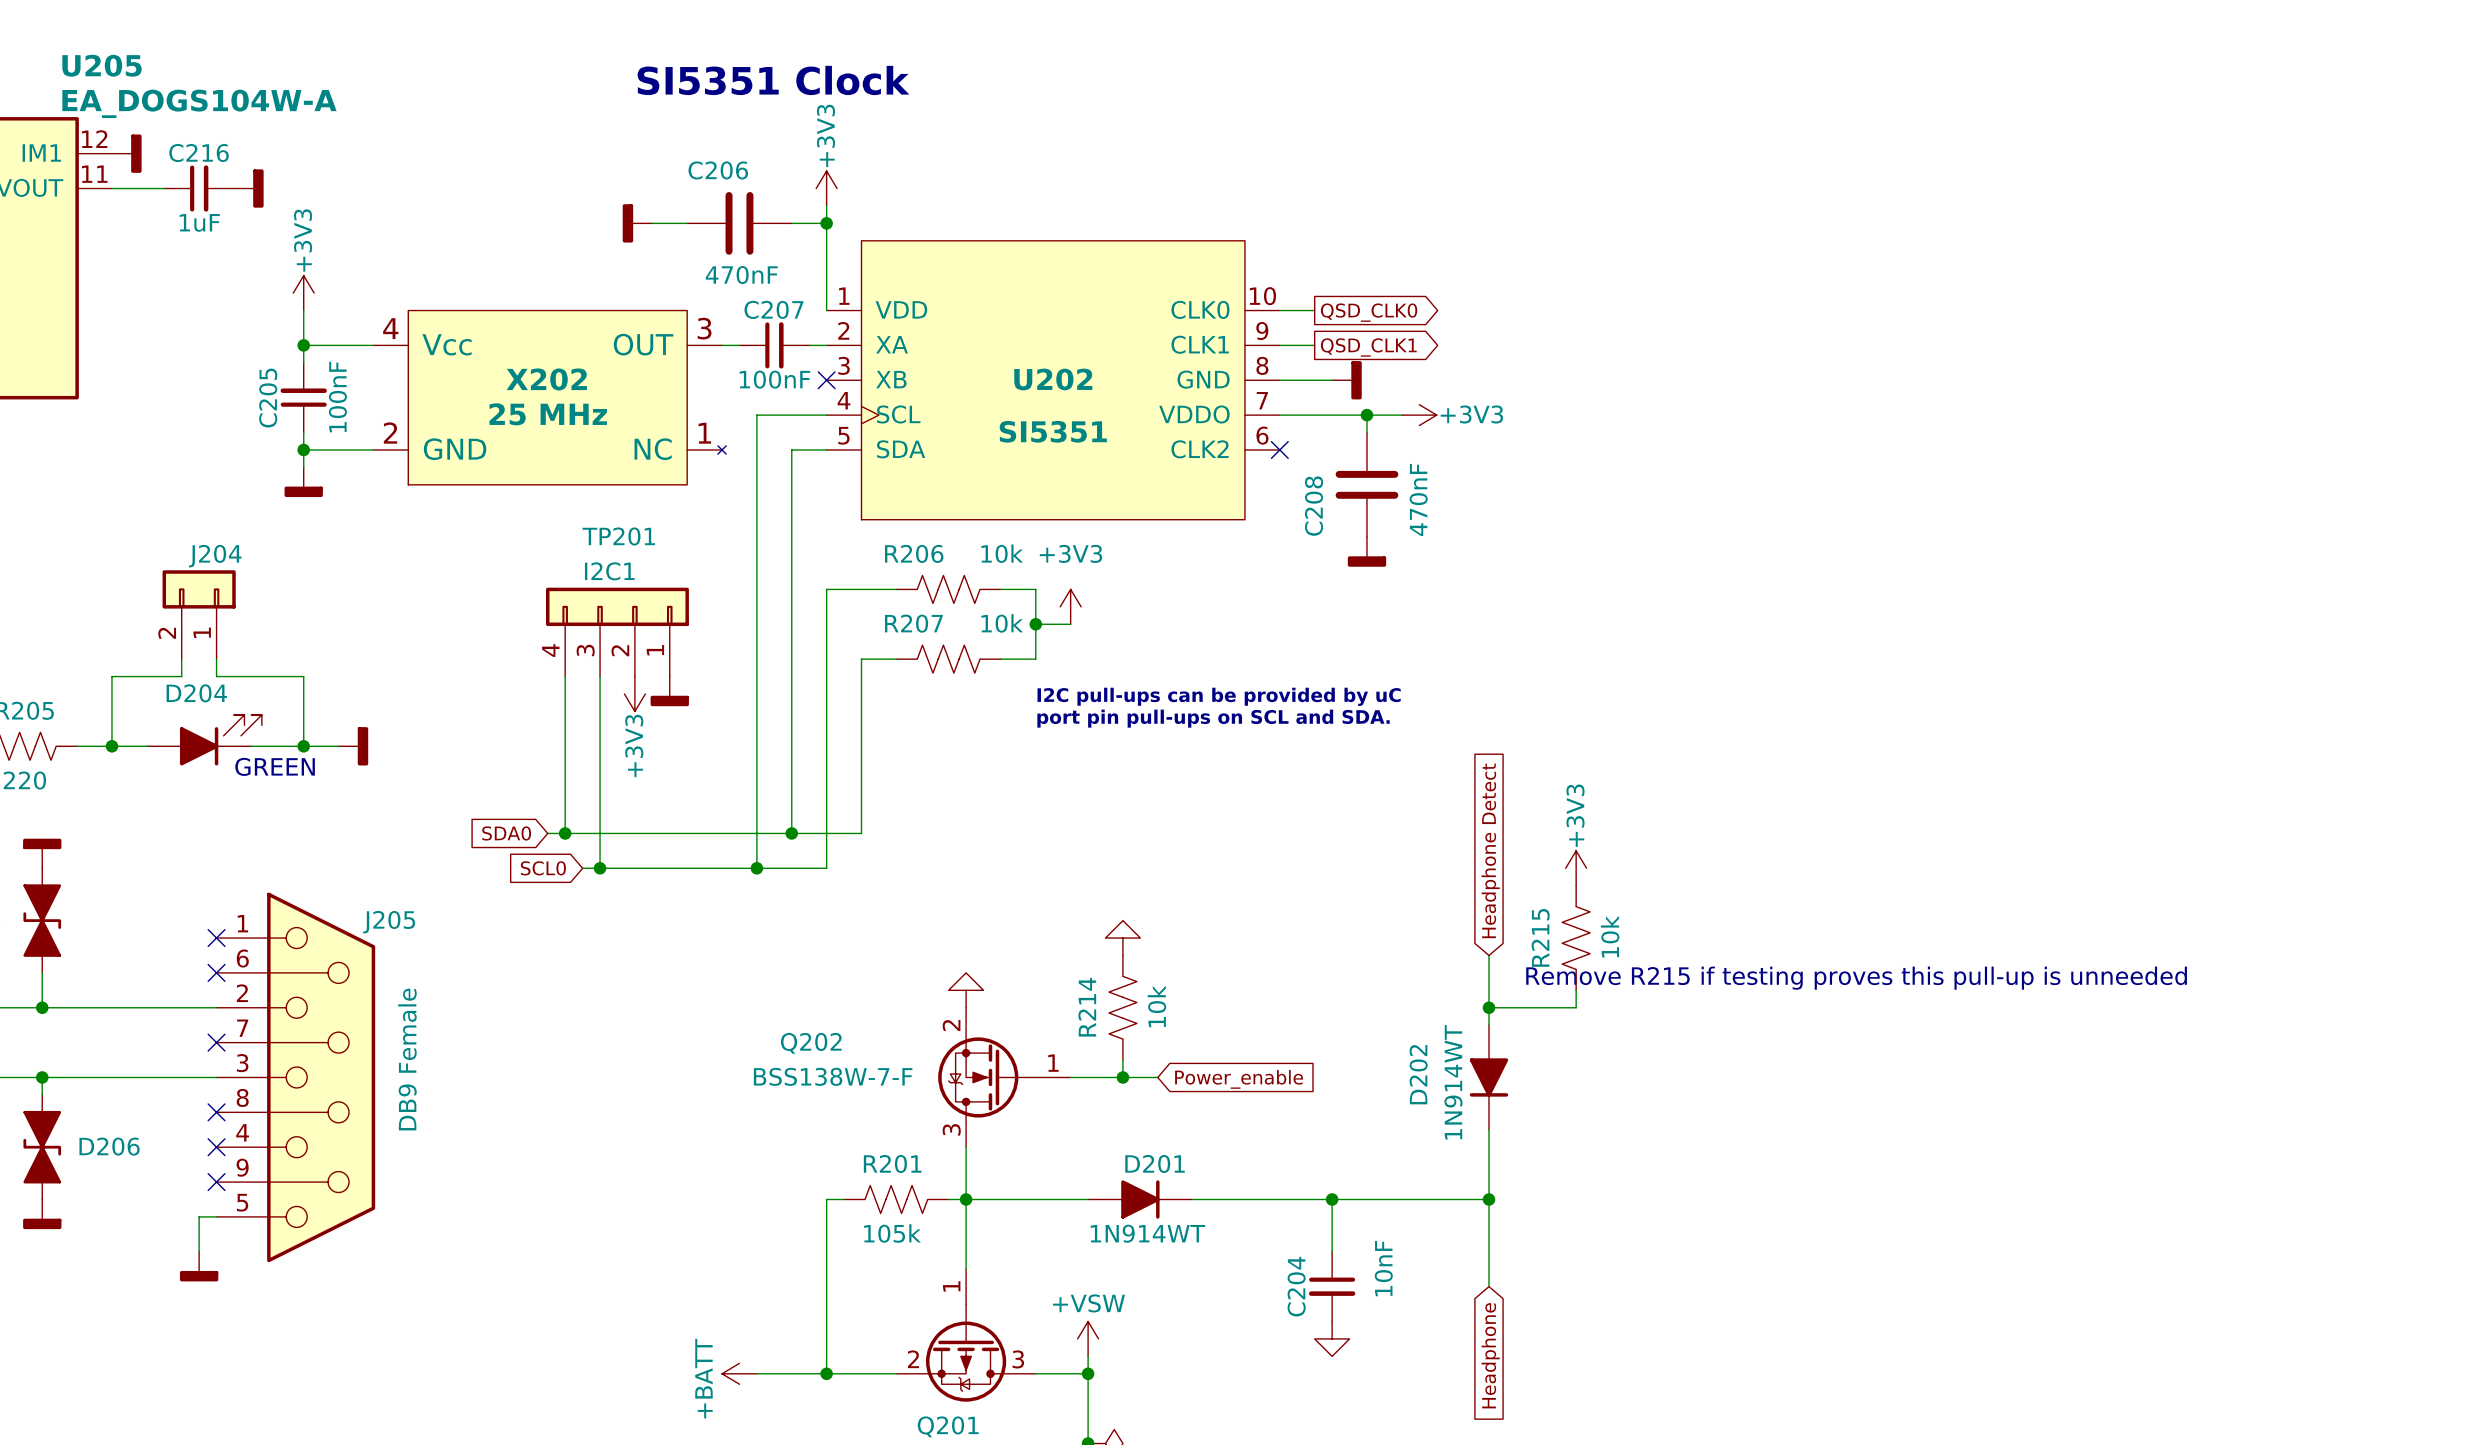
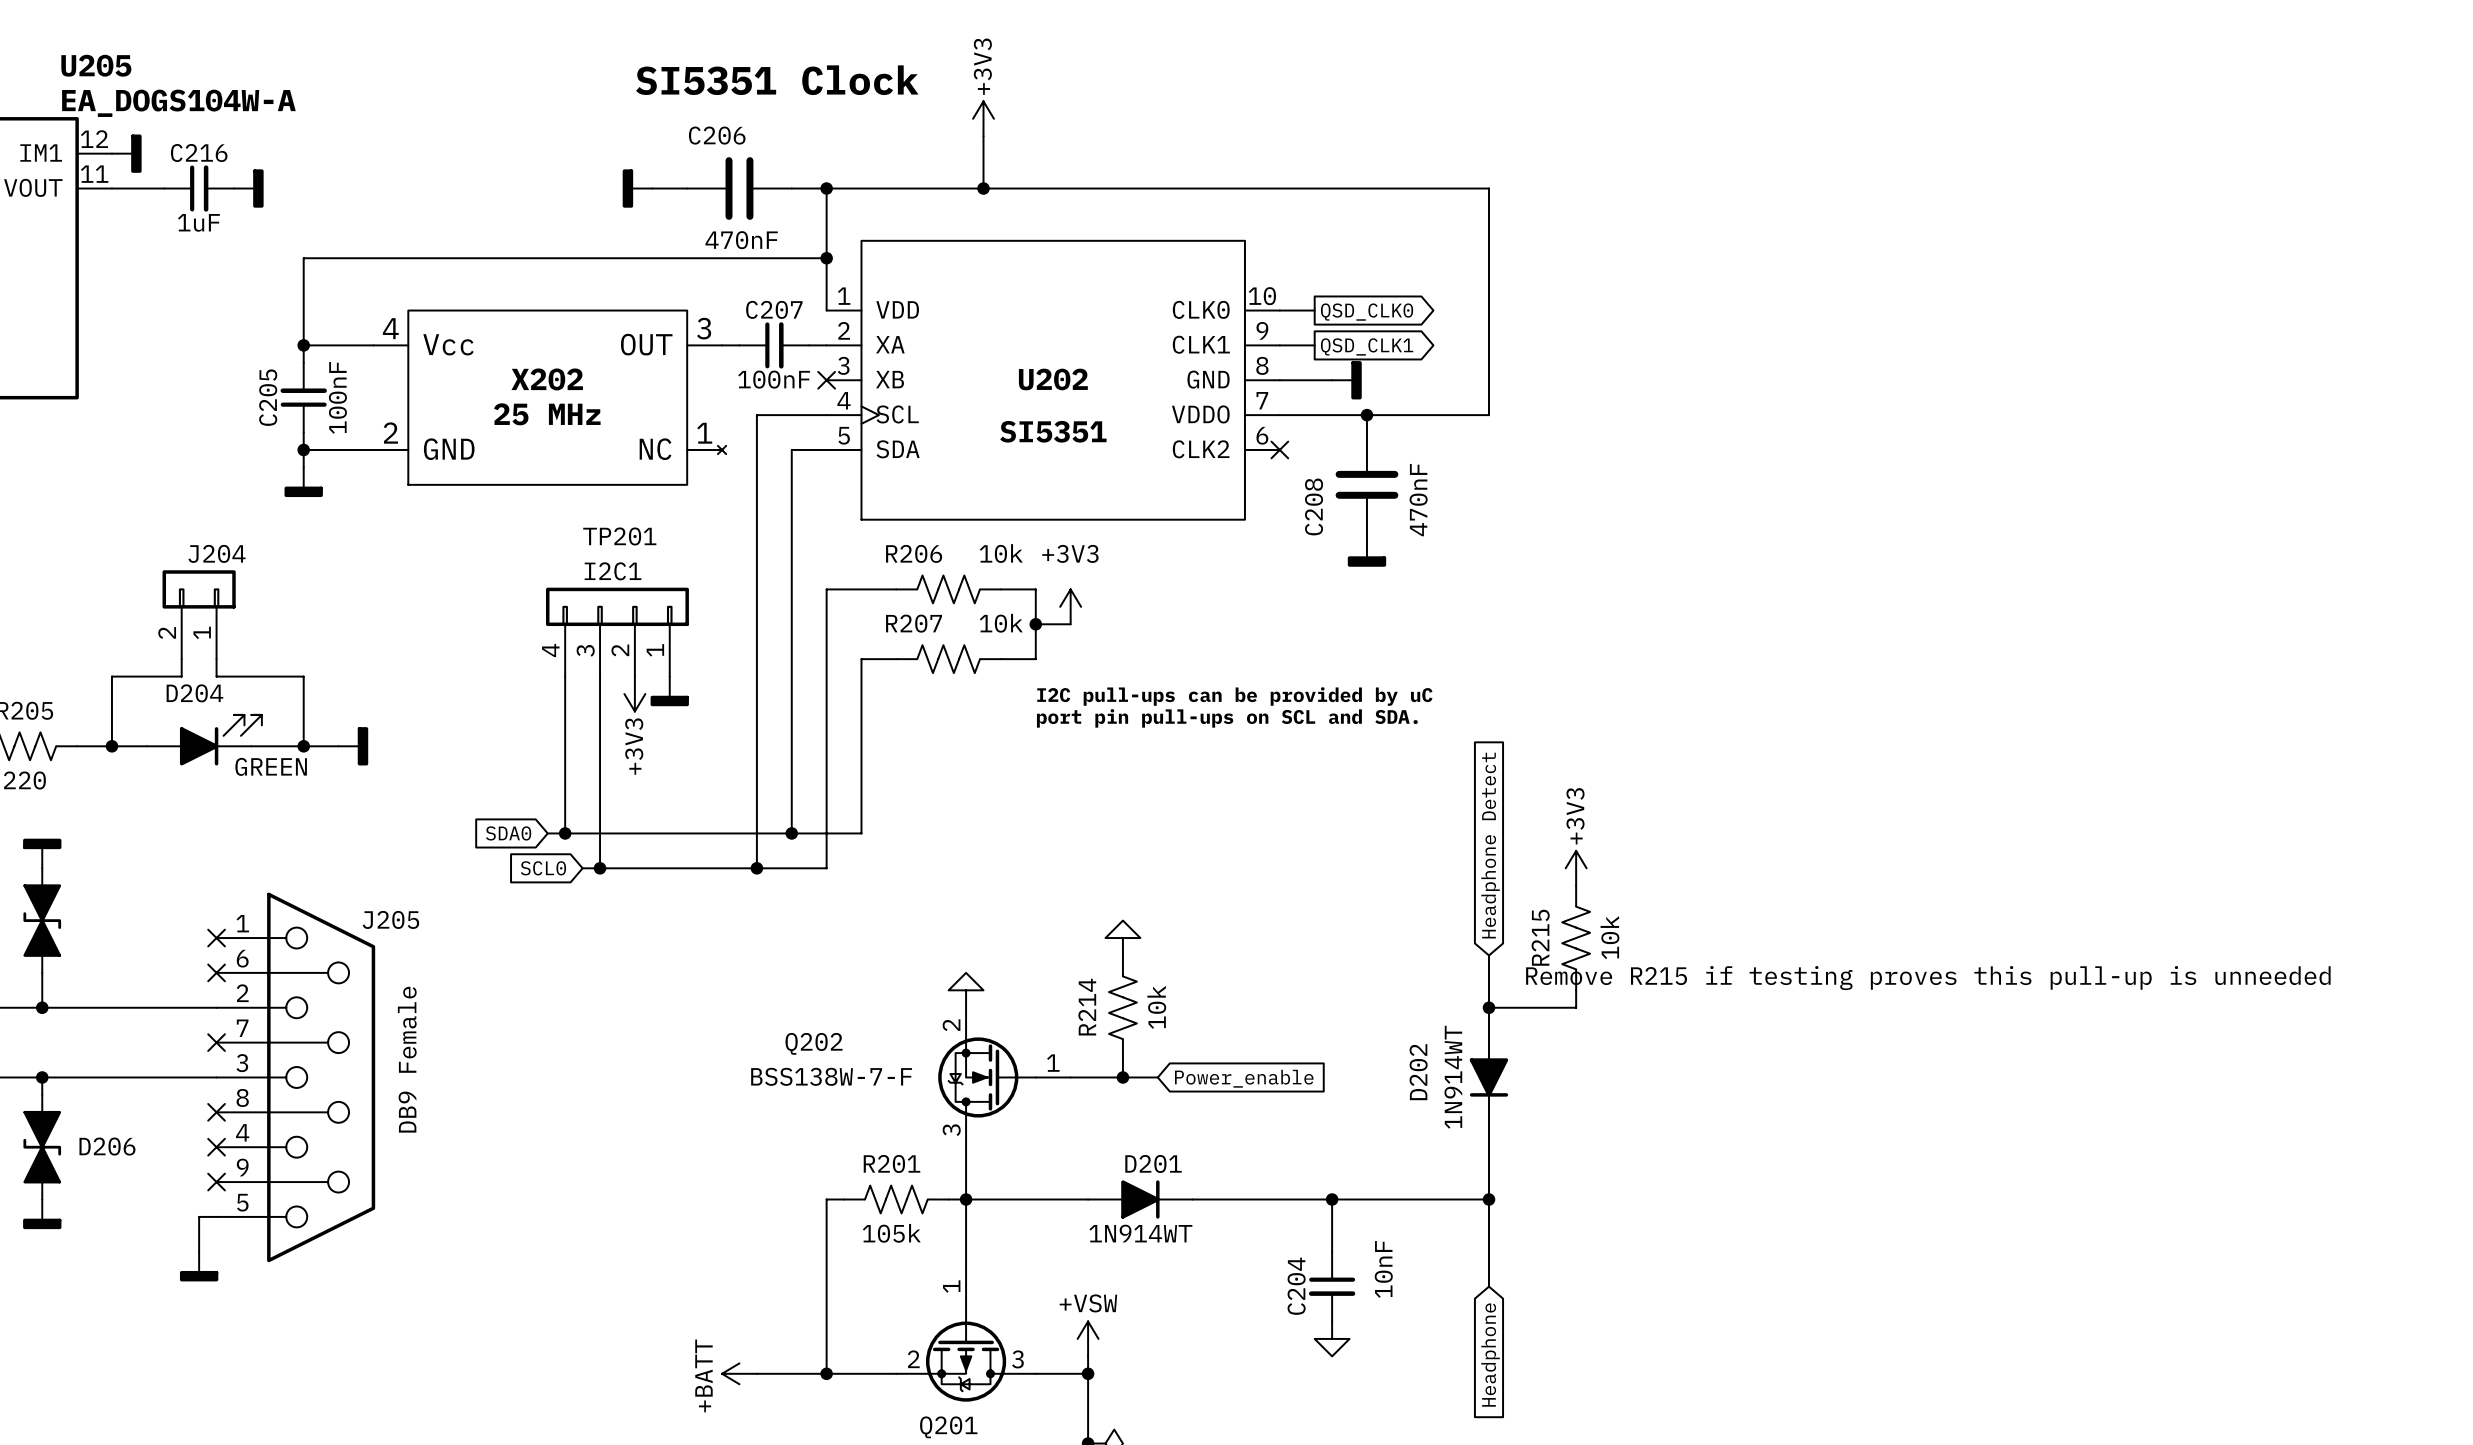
wire: none -> (983, 136) (983, 188)
wire: none -> (791, 188) (1488, 188) (1488, 415) (1401, 415)
junction: none -> (826, 188)
power symbol position: +3V3 (826, 188) -> +3V3 (983, 118)
junction: none -> (983, 188)
power symbol position: (637, 223) -> (637, 188)
wire: (652, 223) (687, 223) -> (652, 188) (687, 188)
C206 position: (739, 223) -> (739, 188)
wire: (791, 223) (826, 223) -> none
junction: (826, 223) -> none
wire: none -> (826, 258) (303, 258) (303, 310)
junction: none -> (826, 258)
power symbol: +3V3 (303, 293) -> none
power symbol: +3V3 (1419, 415) -> none

